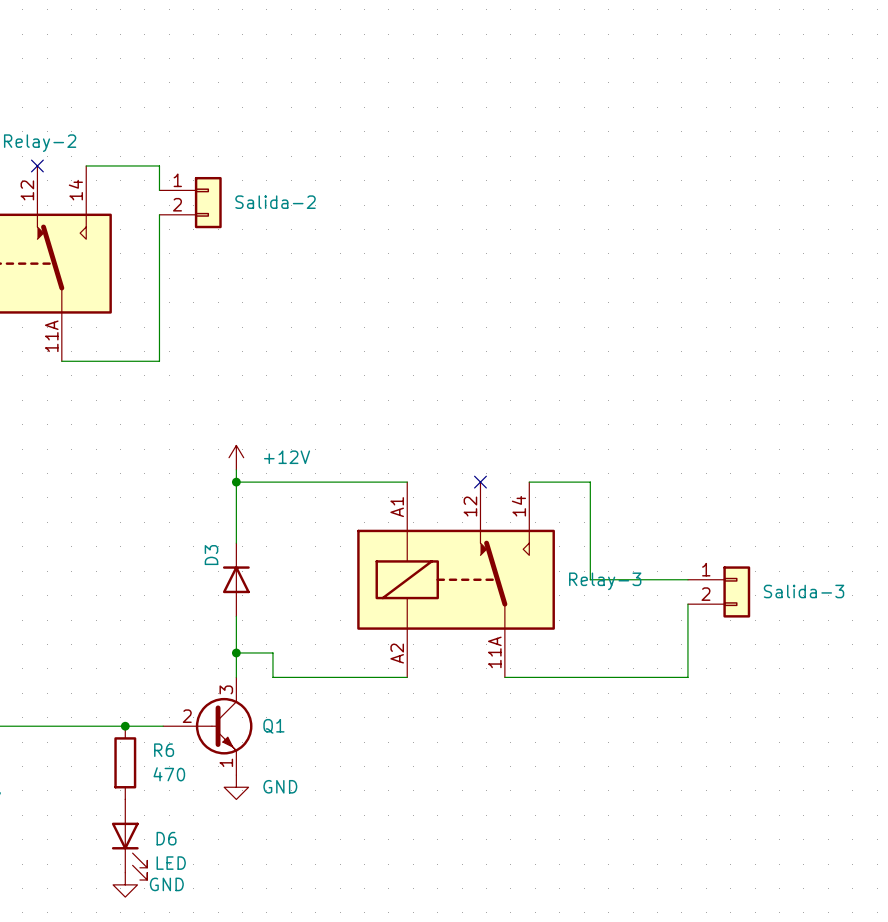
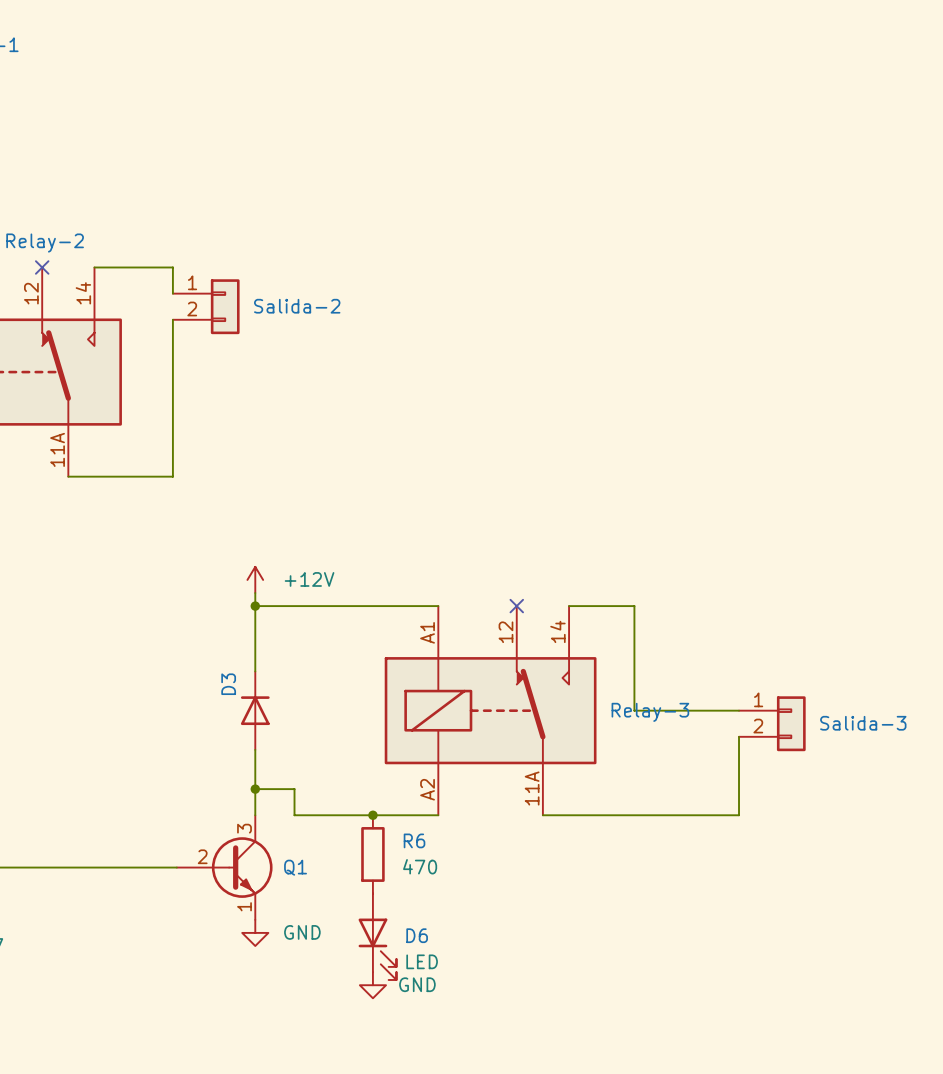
junction: none -> (372, 815)
junction: (125, 726) -> none
R6 position: (125, 762) -> (372, 854)
D6 position: (129, 839) -> (377, 936)
power symbol position: GND (125, 884) -> GND (372, 985)

